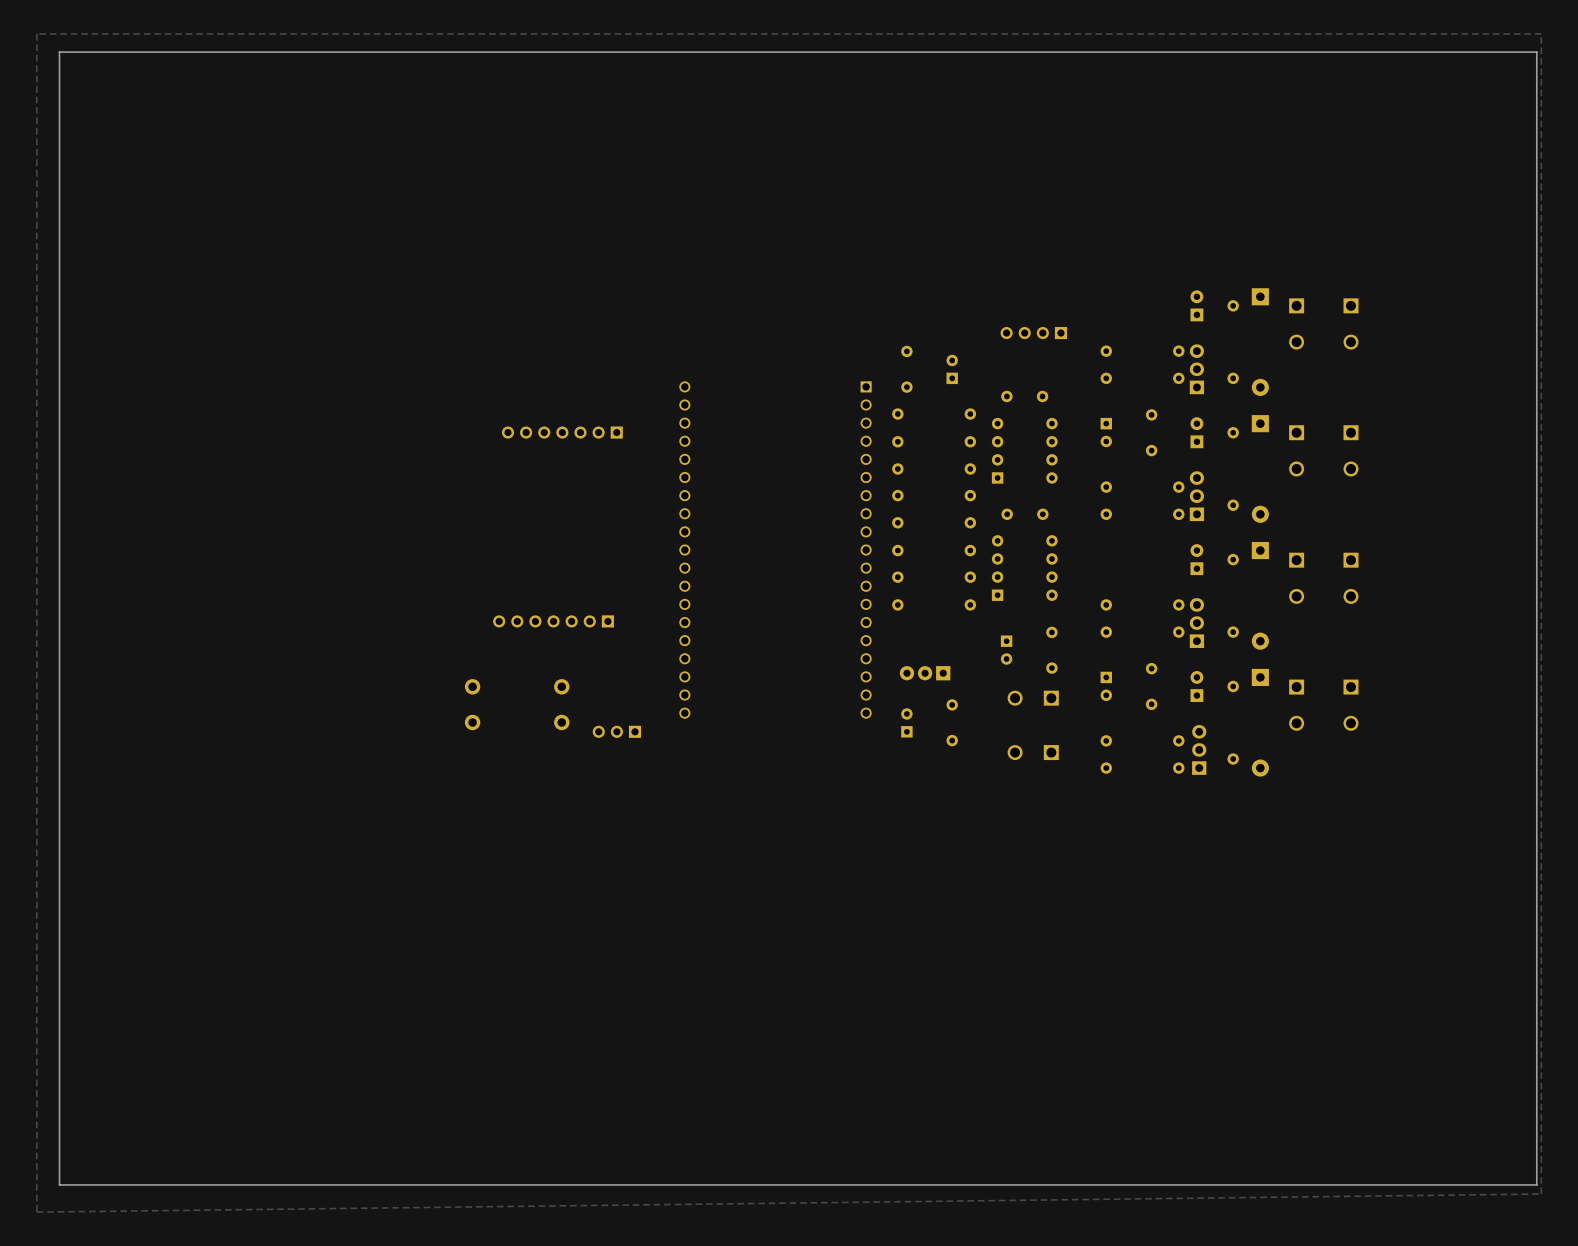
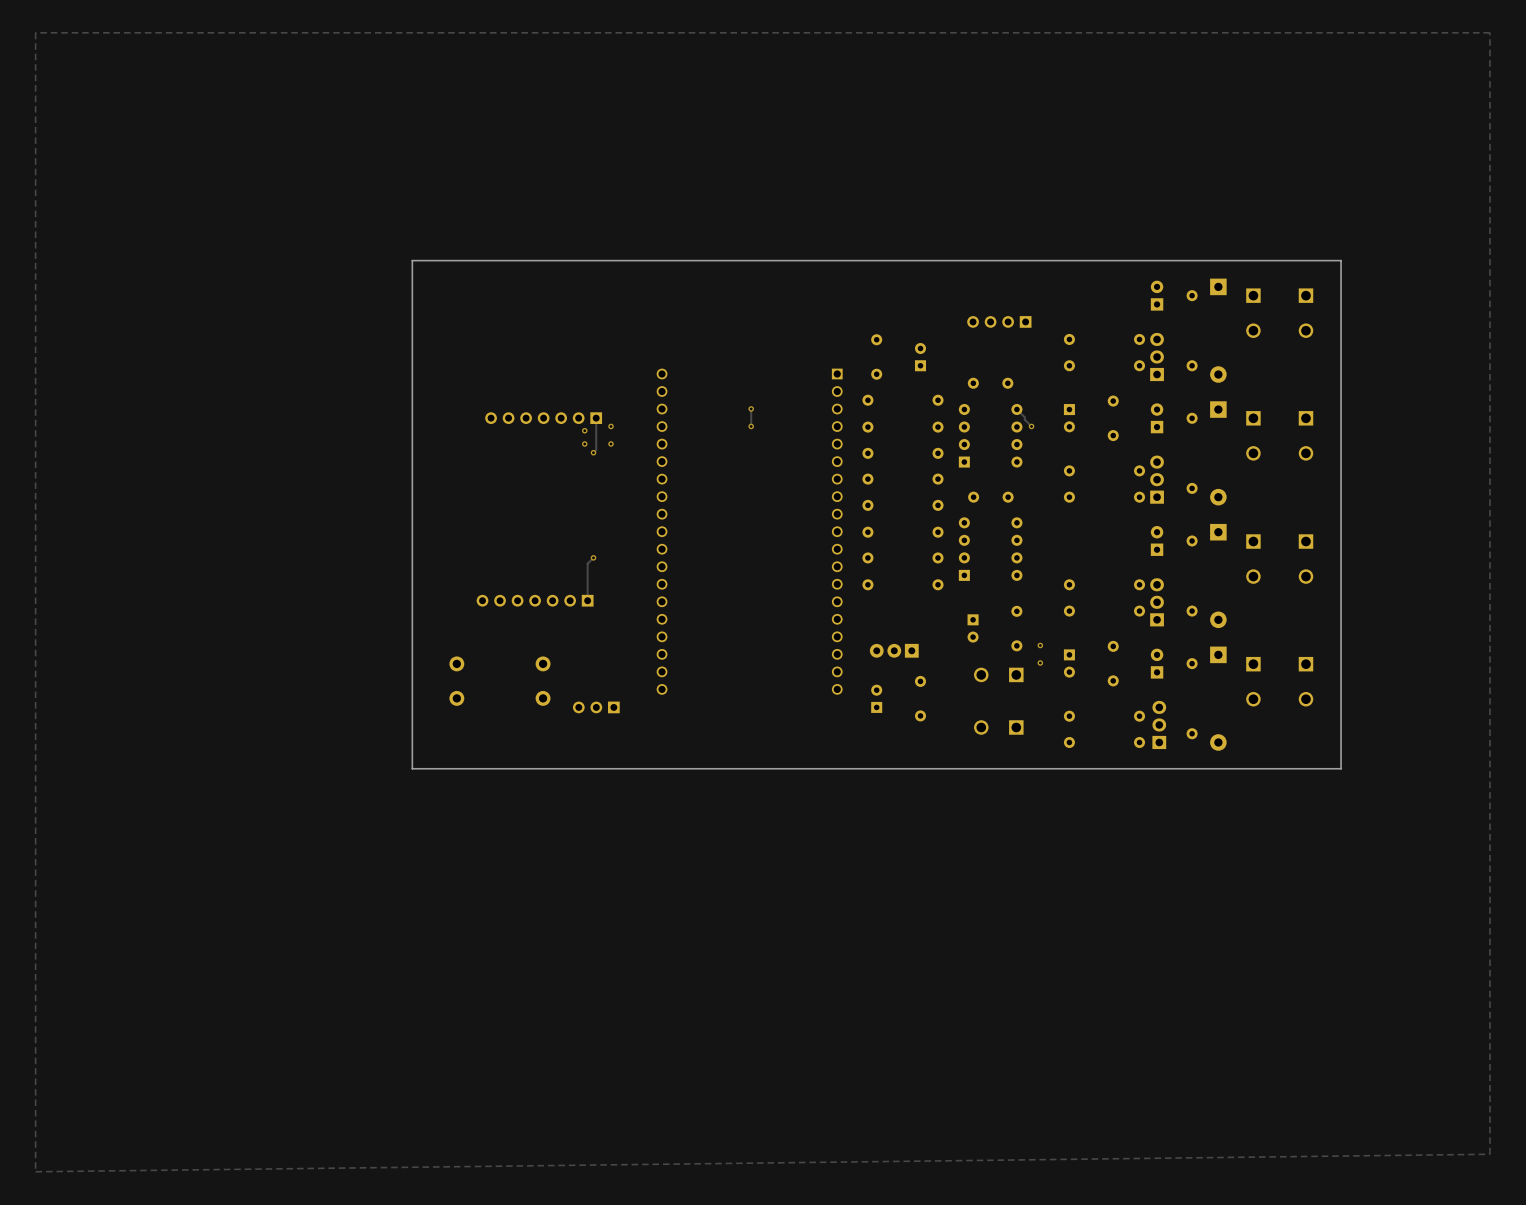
board edge: (1536, 52) (59, 52) (59, 1184) (1536, 1184) (1536, 52) -> none
board edge: none -> (1341, 260) (412, 260) (412, 768) (1341, 768) (1341, 260)
track: none -> (751, 408) (751, 426)
via: none -> (751, 408)
track: none -> (1016, 409) (1031, 426)
track: none -> (596, 418) (596, 450) (593, 452)
via: none -> (611, 426)
via: none -> (751, 426)
via: none -> (1031, 426)
via: none -> (584, 430)
via: none -> (584, 443)
via: none -> (611, 443)
via: none -> (593, 452)
track: none -> (593, 557) (587, 563) (587, 600)
via: none -> (593, 557)
via: none -> (1040, 645)
via: none -> (1040, 663)

